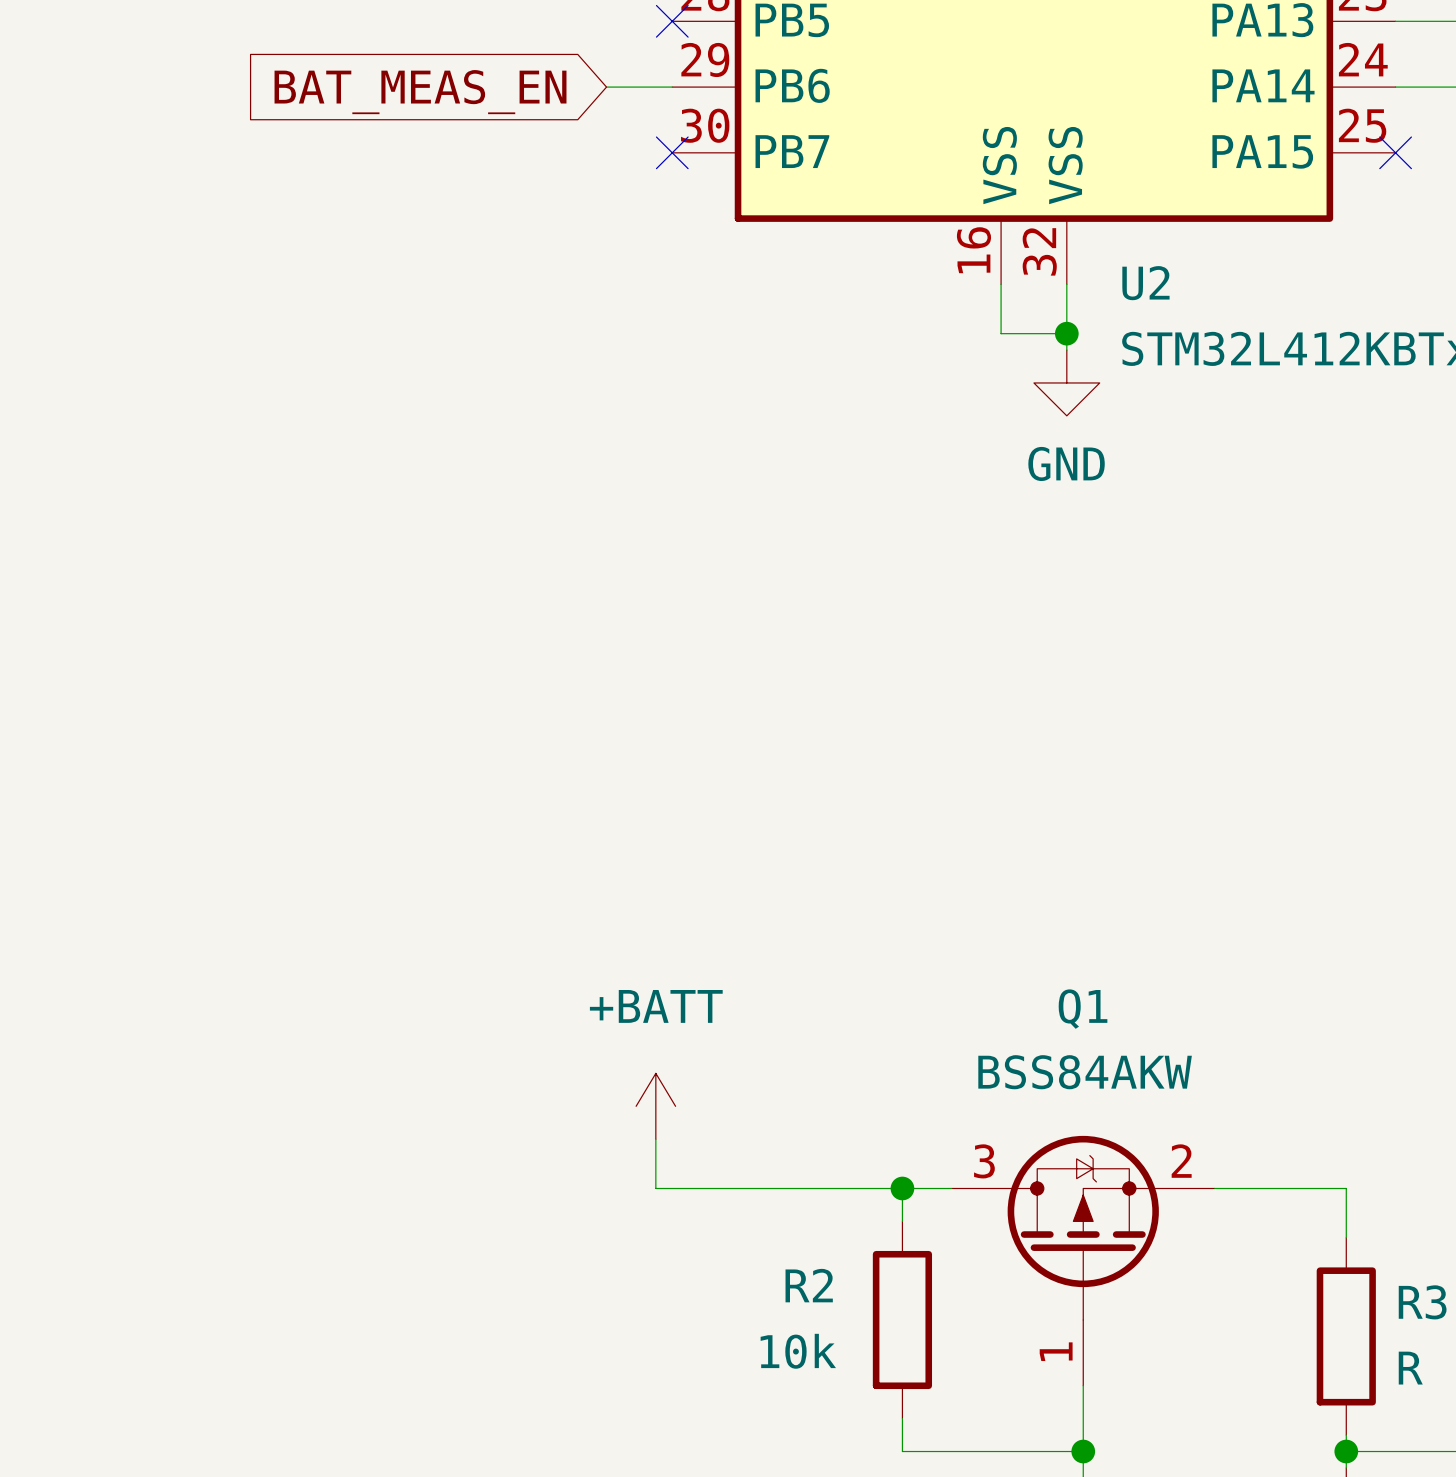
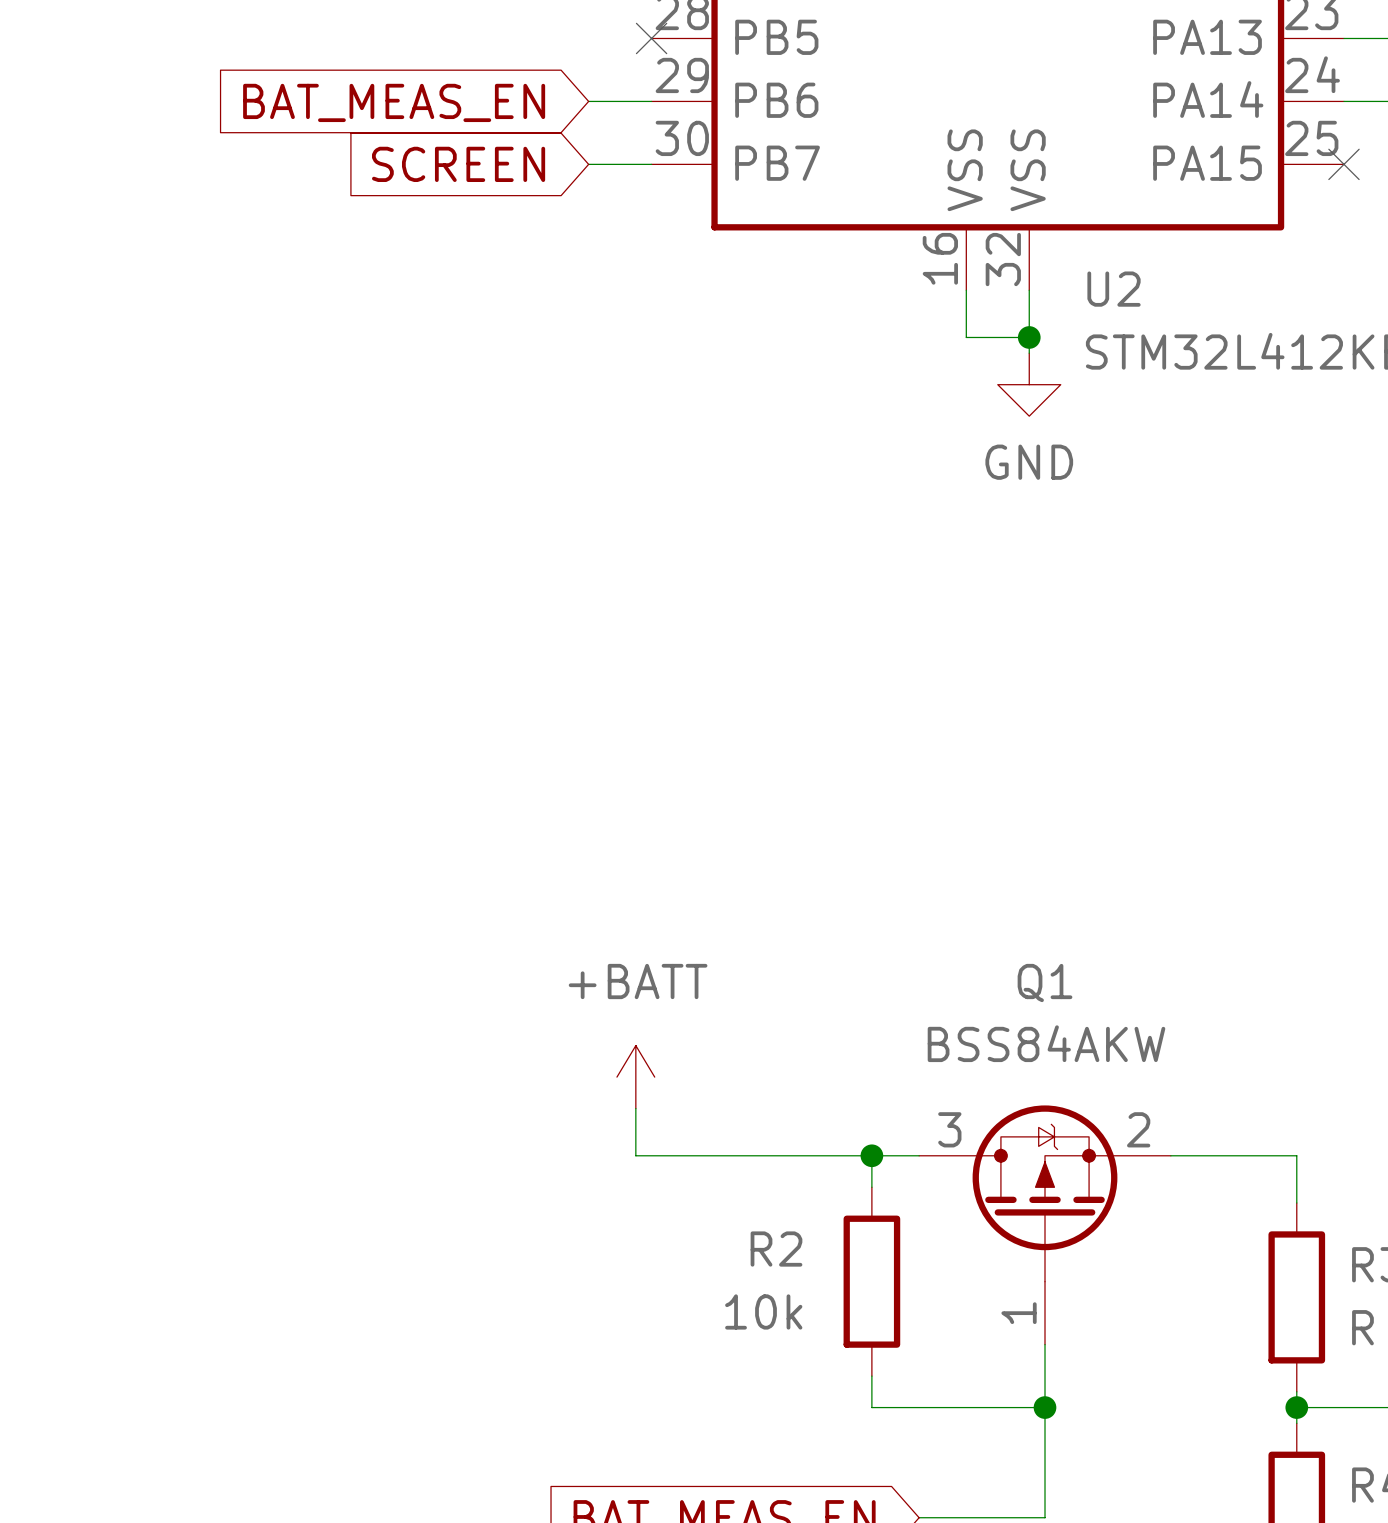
global label: none -> SCREEN (458, 164)
wire: none -> (588, 164) (651, 164)
no-connect mark: (672, 152) -> none

